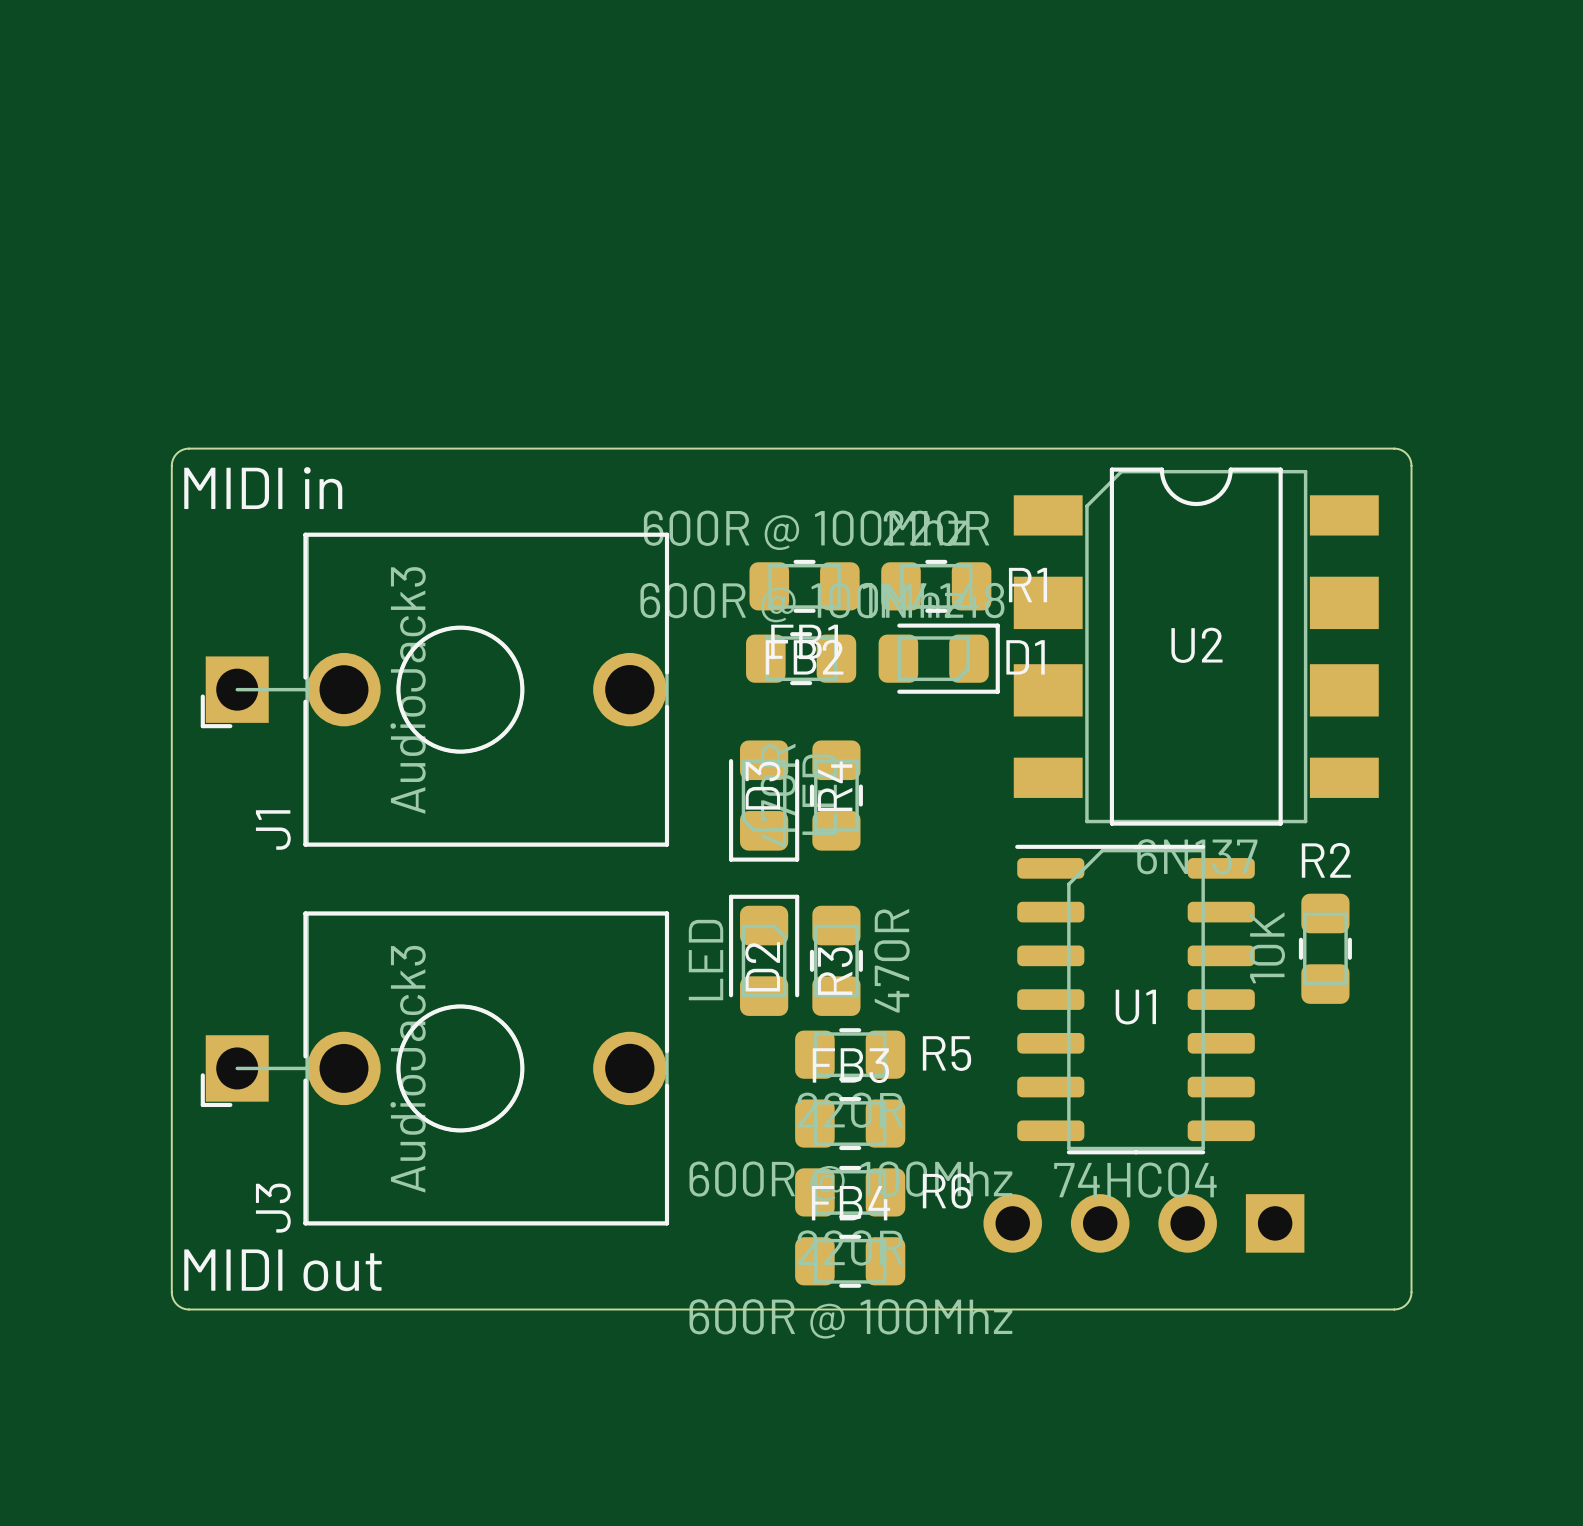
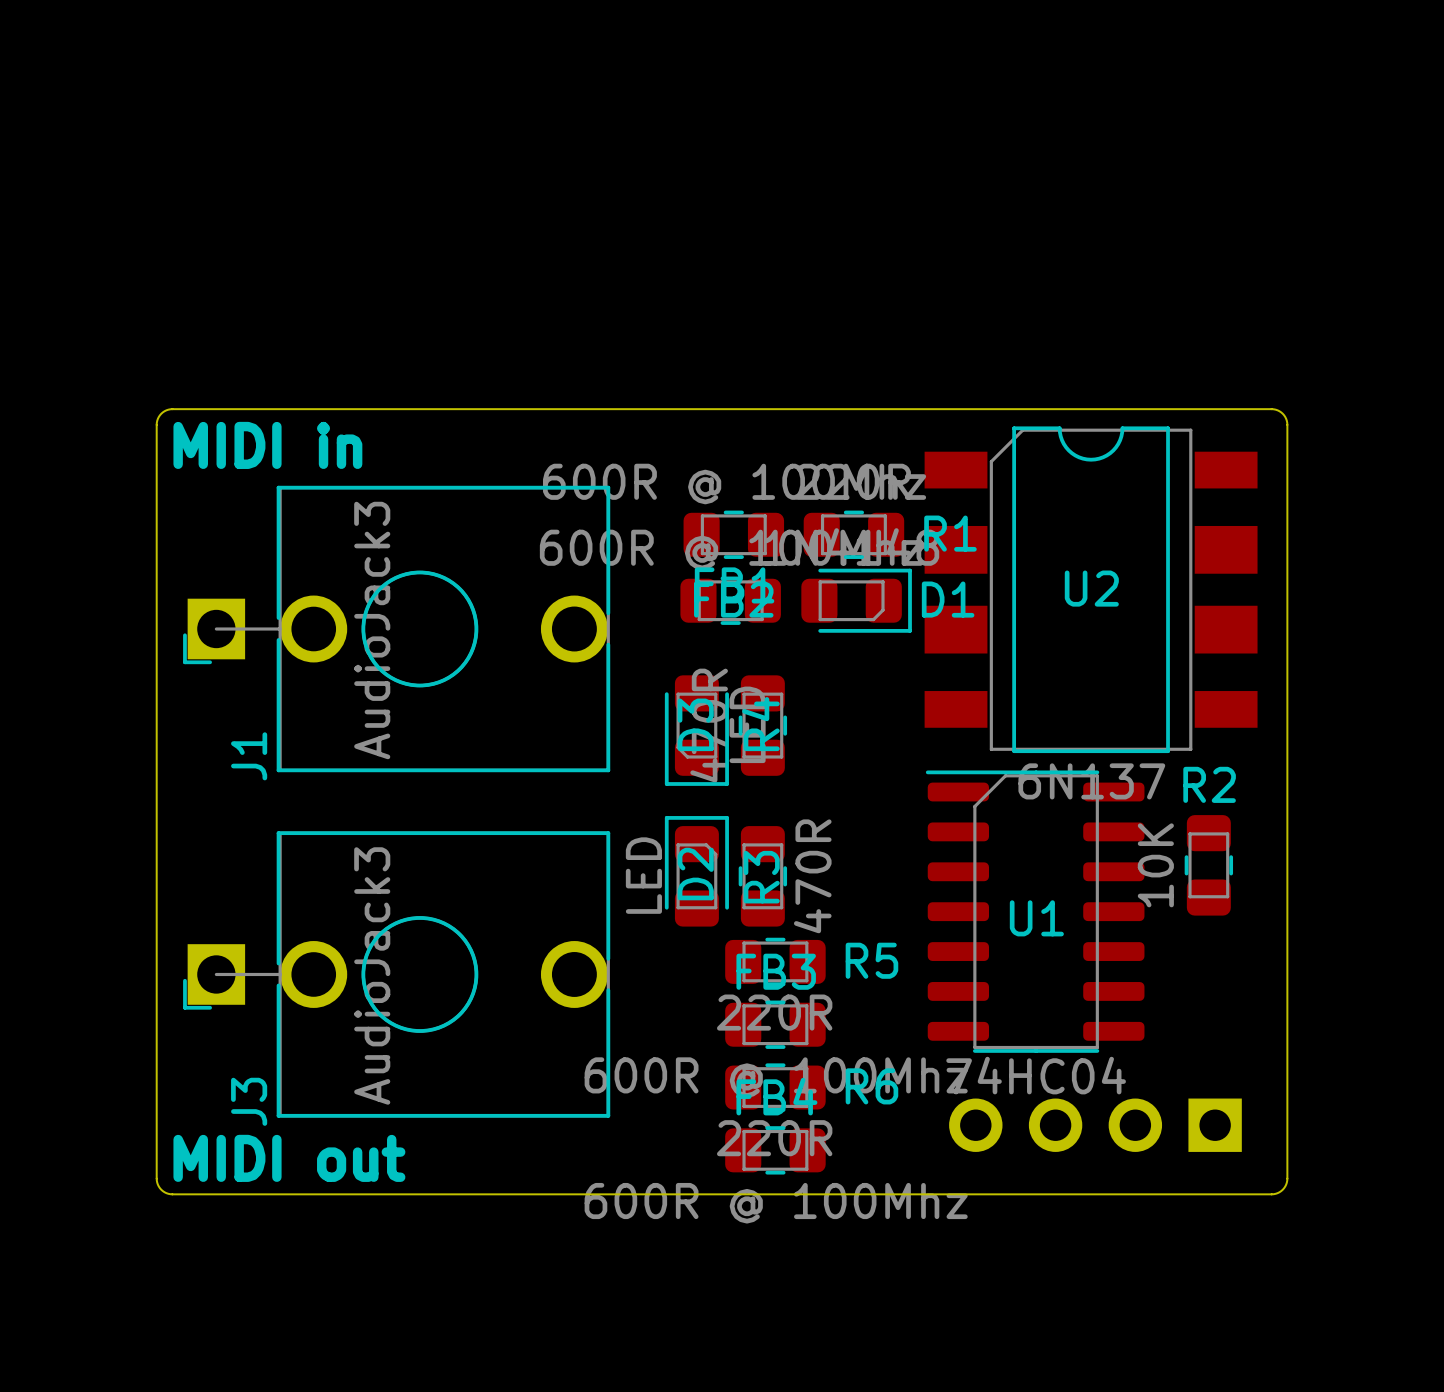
part position: (1143, 1223) -> (1095, 1125)

